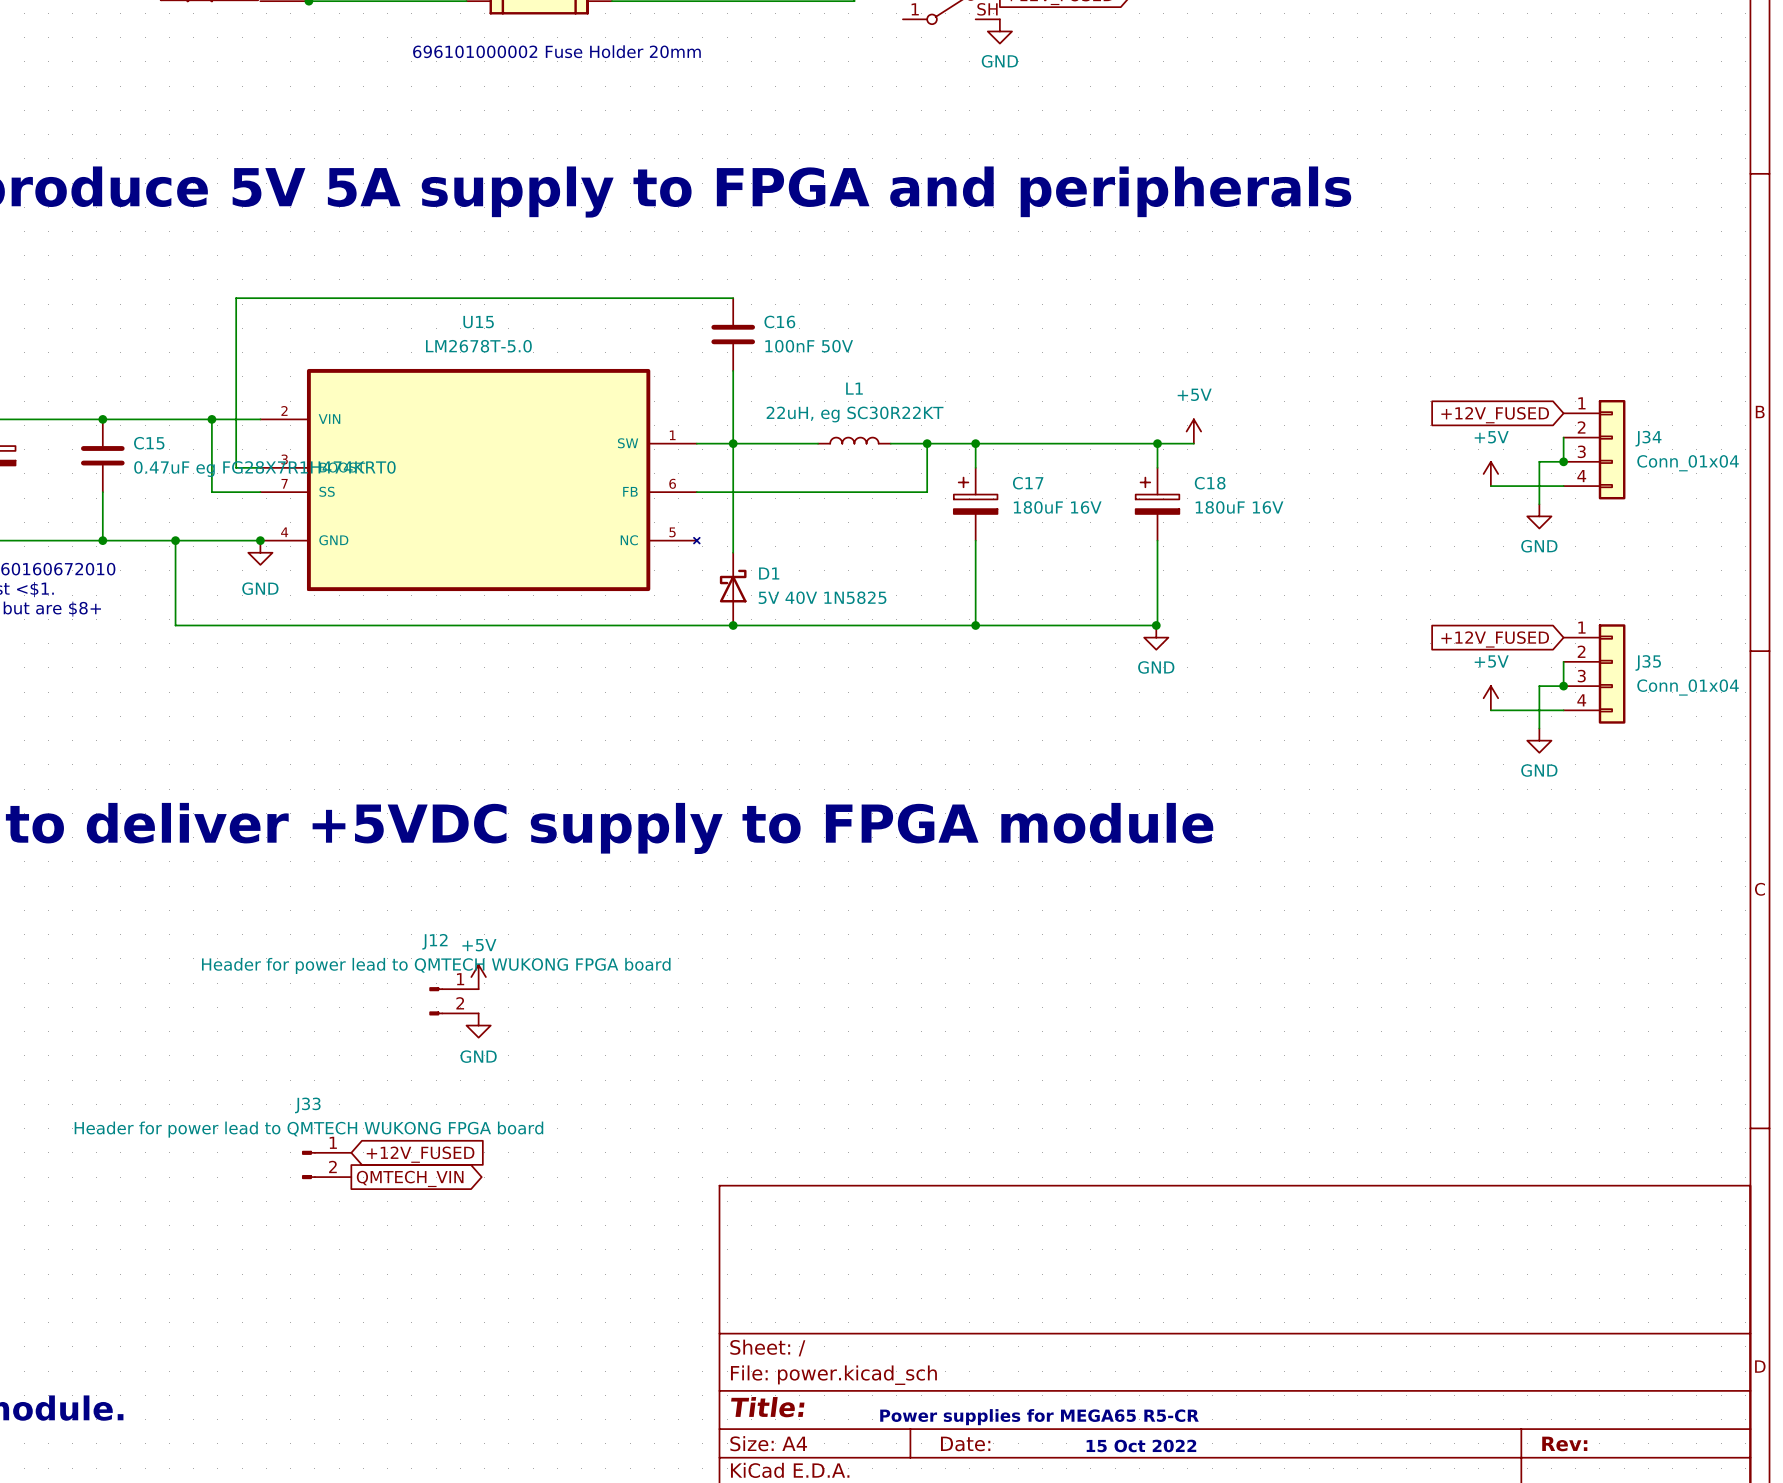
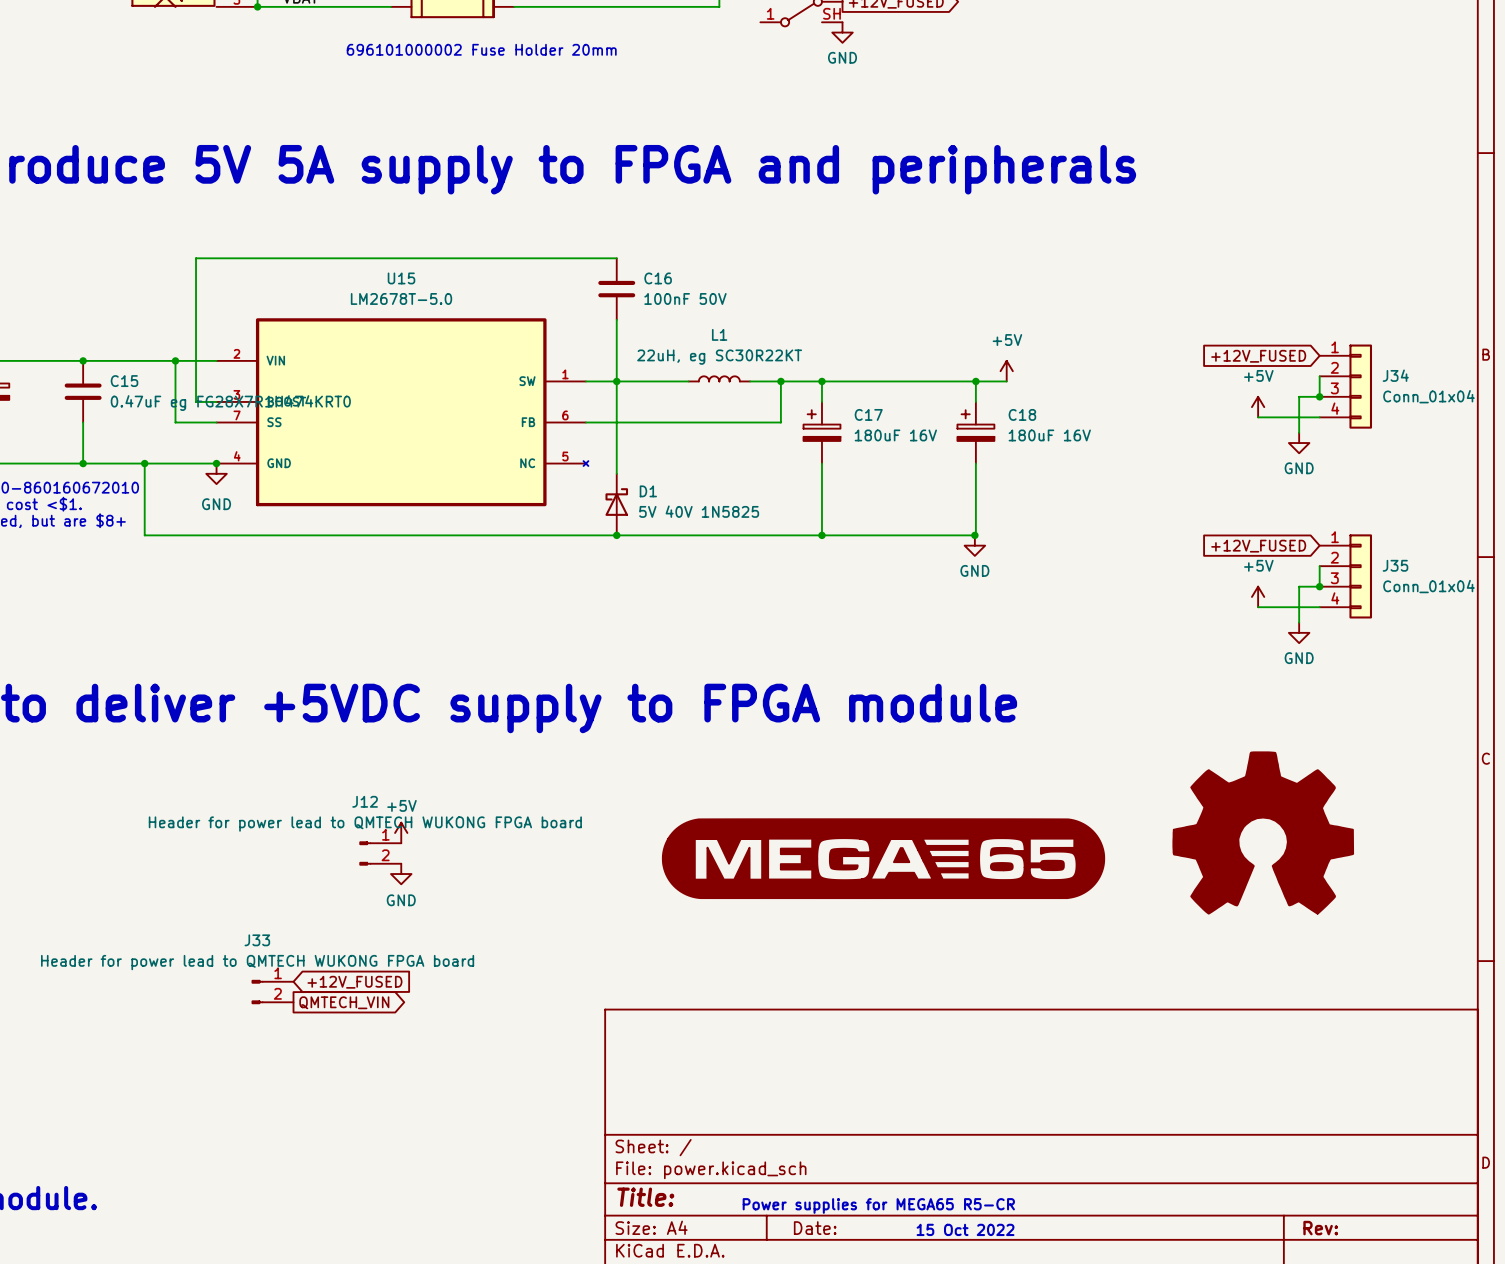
power symbol: none -> (1263, 832)
power symbol: none -> (883, 858)

